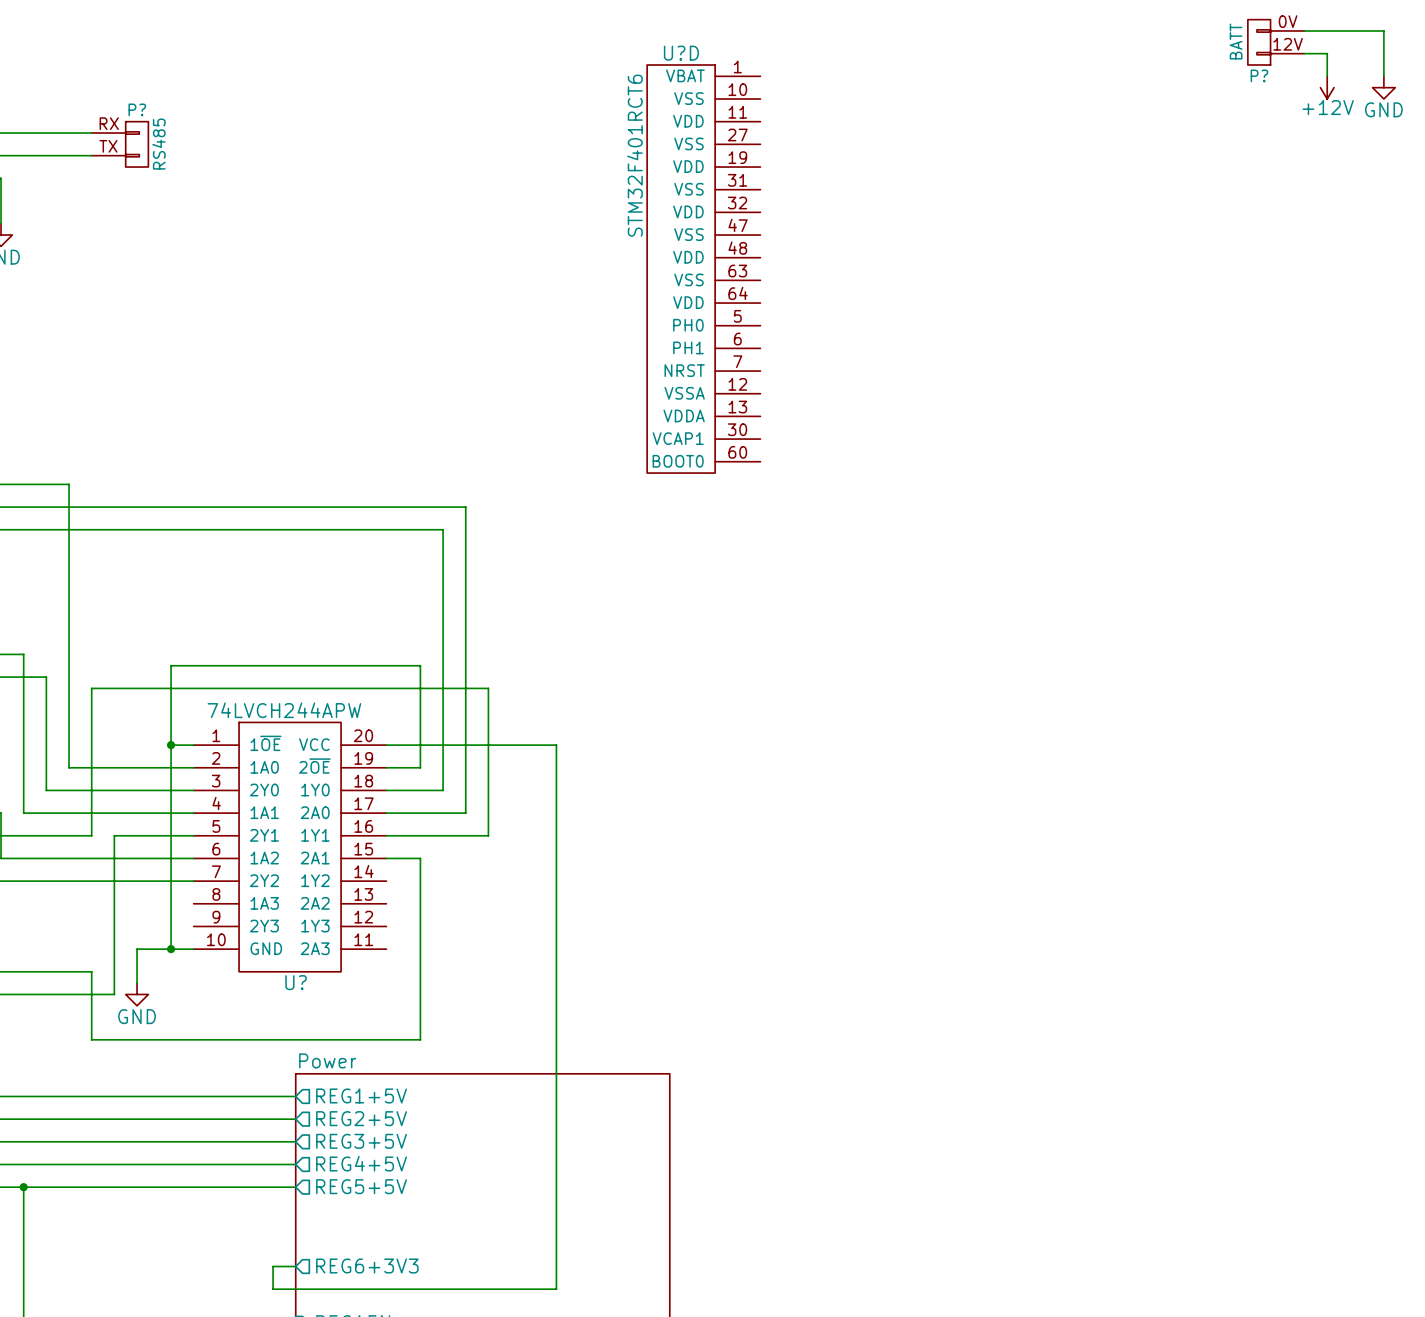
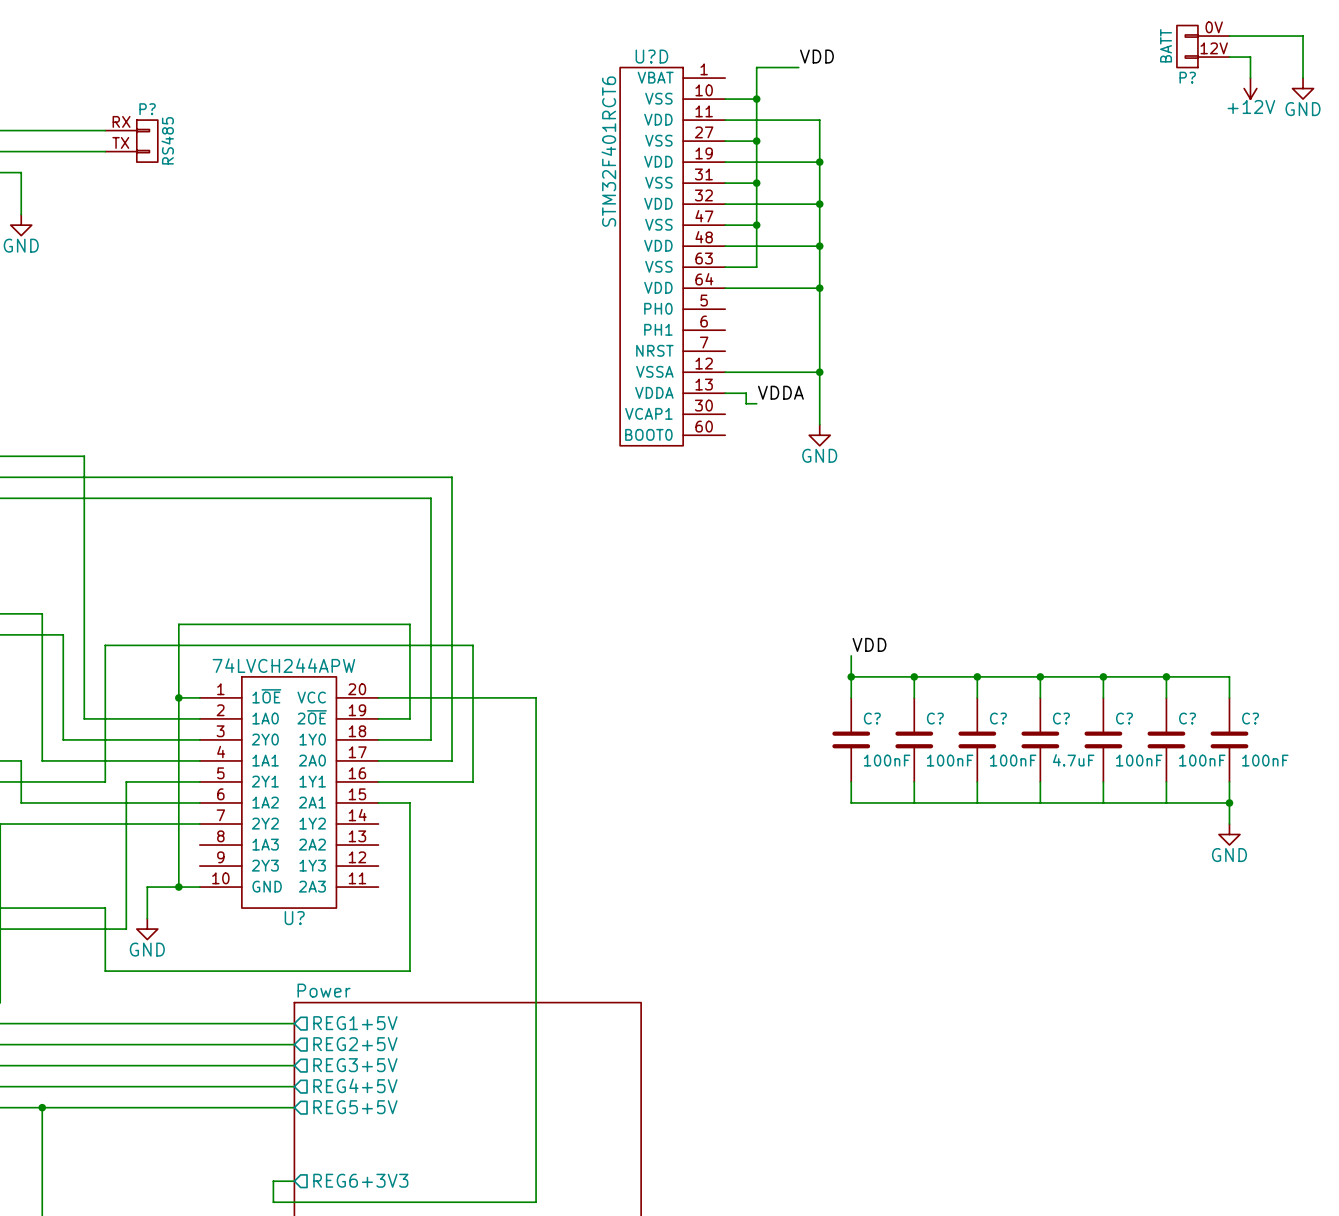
label: none -> VDD (816, 56)
wire: none -> (798, 67) (756, 67) (756, 267) (725, 267)
wire: none -> (725, 99) (756, 99)
junction: none -> (756, 99)
wire: none -> (725, 120) (819, 120) (819, 424)
wire: none -> (725, 141) (756, 141)
junction: none -> (756, 141)
wire: none -> (725, 162) (819, 162)
junction: none -> (819, 162)
wire: none -> (725, 183) (756, 183)
junction: none -> (756, 183)
wire: none -> (725, 204) (819, 204)
junction: none -> (819, 204)
wire: none -> (725, 225) (756, 225)
junction: none -> (756, 225)
wire: none -> (725, 246) (819, 246)
junction: none -> (819, 246)
wire: none -> (725, 288) (819, 288)
junction: none -> (819, 288)
wire: none -> (725, 372) (819, 372)
junction: none -> (819, 372)
label: none -> VDDA (780, 392)
wire: none -> (725, 393) (746, 393) (746, 403) (756, 403)
power symbol: none -> GND (819, 435)
label: none -> VDD (869, 644)
wire: none -> (851, 655) (851, 697)
wire: none -> (851, 676) (1229, 676) (1229, 697)
junction: none -> (851, 676)
wire: none -> (914, 676) (914, 697)
junction: none -> (914, 676)
wire: none -> (977, 676) (977, 697)
junction: none -> (977, 676)
wire: none -> (1040, 676) (1040, 697)
junction: none -> (1040, 676)
wire: none -> (1103, 676) (1103, 697)
junction: none -> (1103, 676)
wire: none -> (1166, 676) (1166, 697)
junction: none -> (1166, 676)
C?: none -> 100nF (851, 739)
C?: none -> 100nF (914, 739)
C?: none -> 100nF (977, 739)
C?: none -> 4.7uF (1040, 739)
C?: none -> 100nF (1103, 739)
C?: none -> 100nF (1166, 739)
C?: none -> 100nF (1229, 739)
wire: none -> (851, 781) (851, 802) (1229, 802)
wire: none -> (914, 781) (914, 802)
wire: none -> (977, 781) (977, 802)
wire: none -> (1040, 781) (1040, 802)
wire: none -> (1103, 781) (1103, 802)
wire: none -> (1166, 781) (1166, 802)
wire: none -> (1229, 781) (1229, 824)
junction: none -> (1229, 802)
power symbol: none -> GND (1229, 834)

